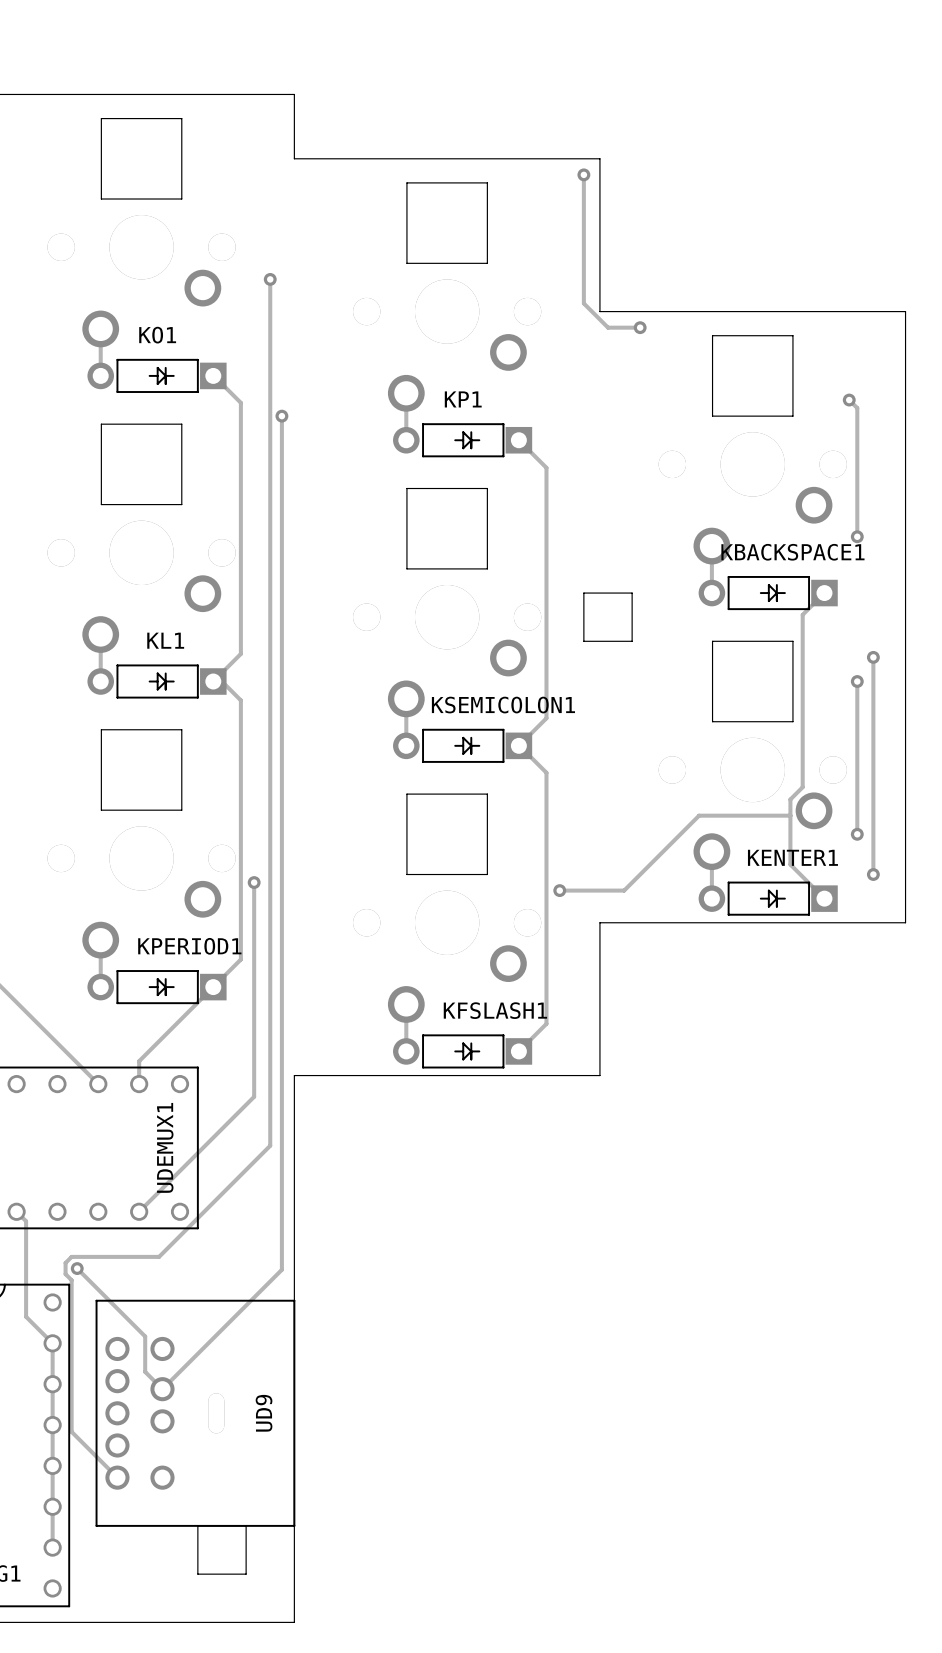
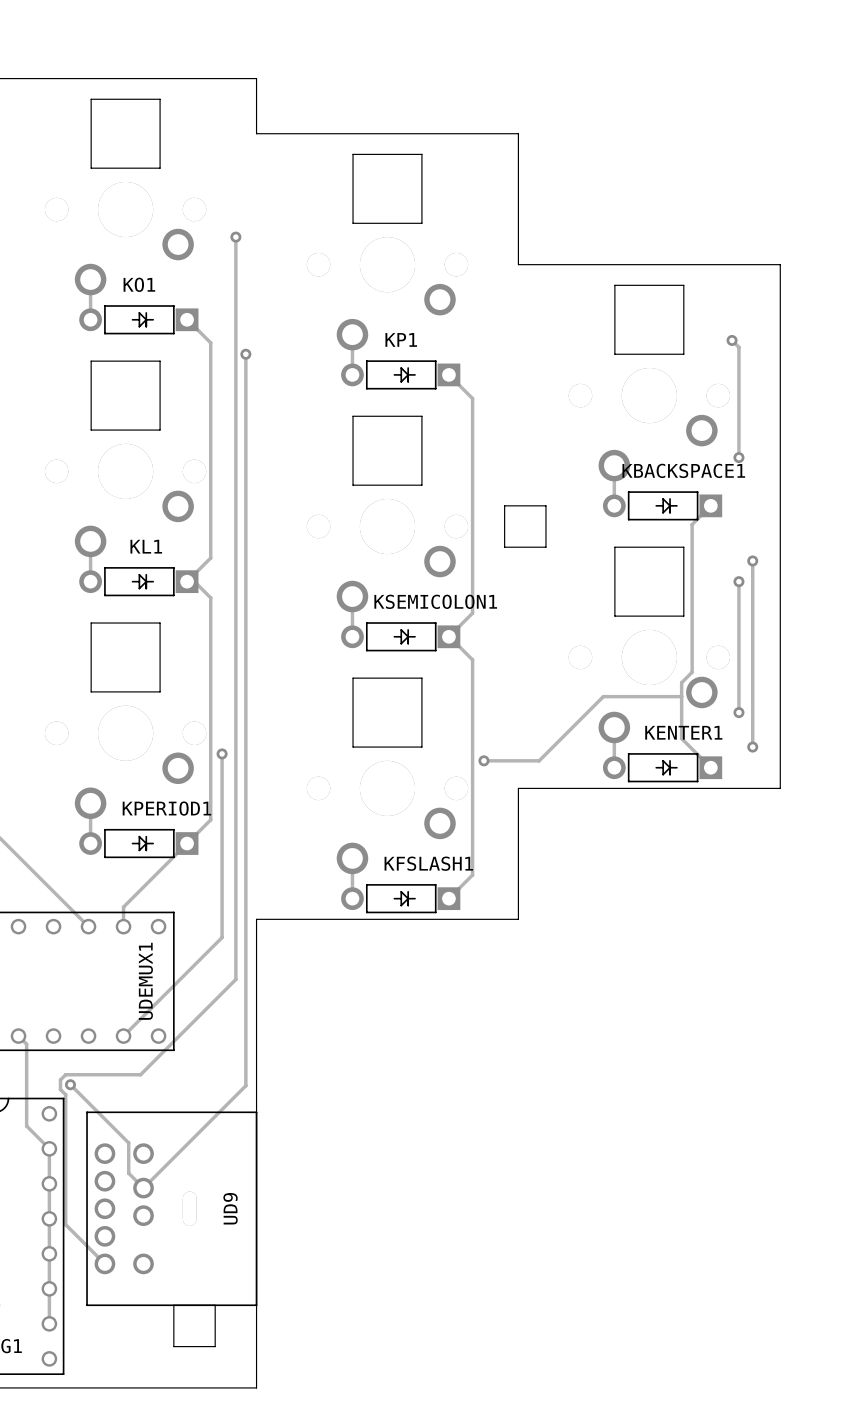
track: (583, 174) (583, 303) (608, 327) (640, 327) -> none
via: (583, 174) -> none
via: (640, 327) -> none

